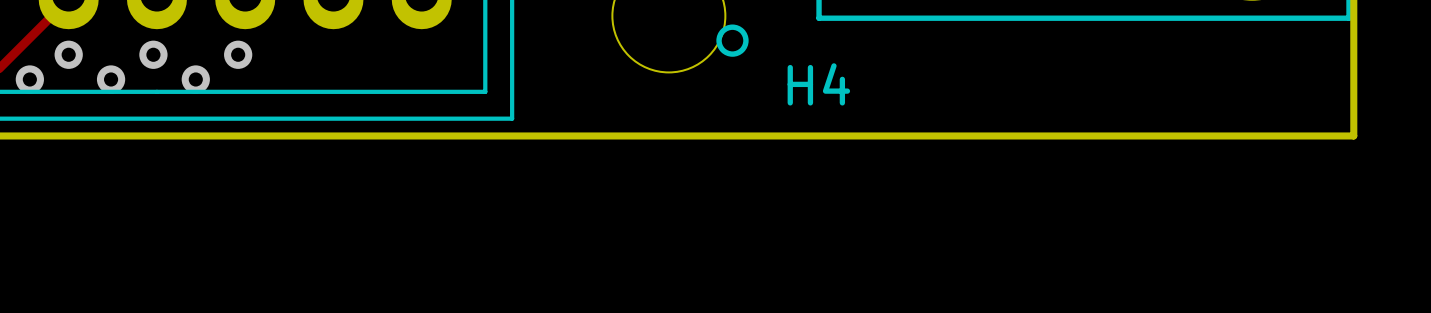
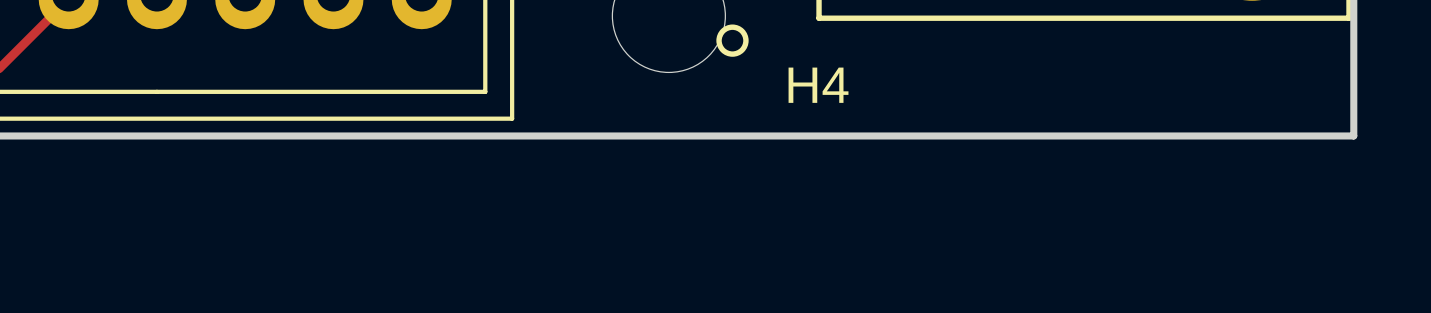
via: (68, 54) -> none
via: (153, 54) -> none
via: (238, 54) -> none
via: (29, 79) -> none
via: (111, 79) -> none
via: (195, 79) -> none

